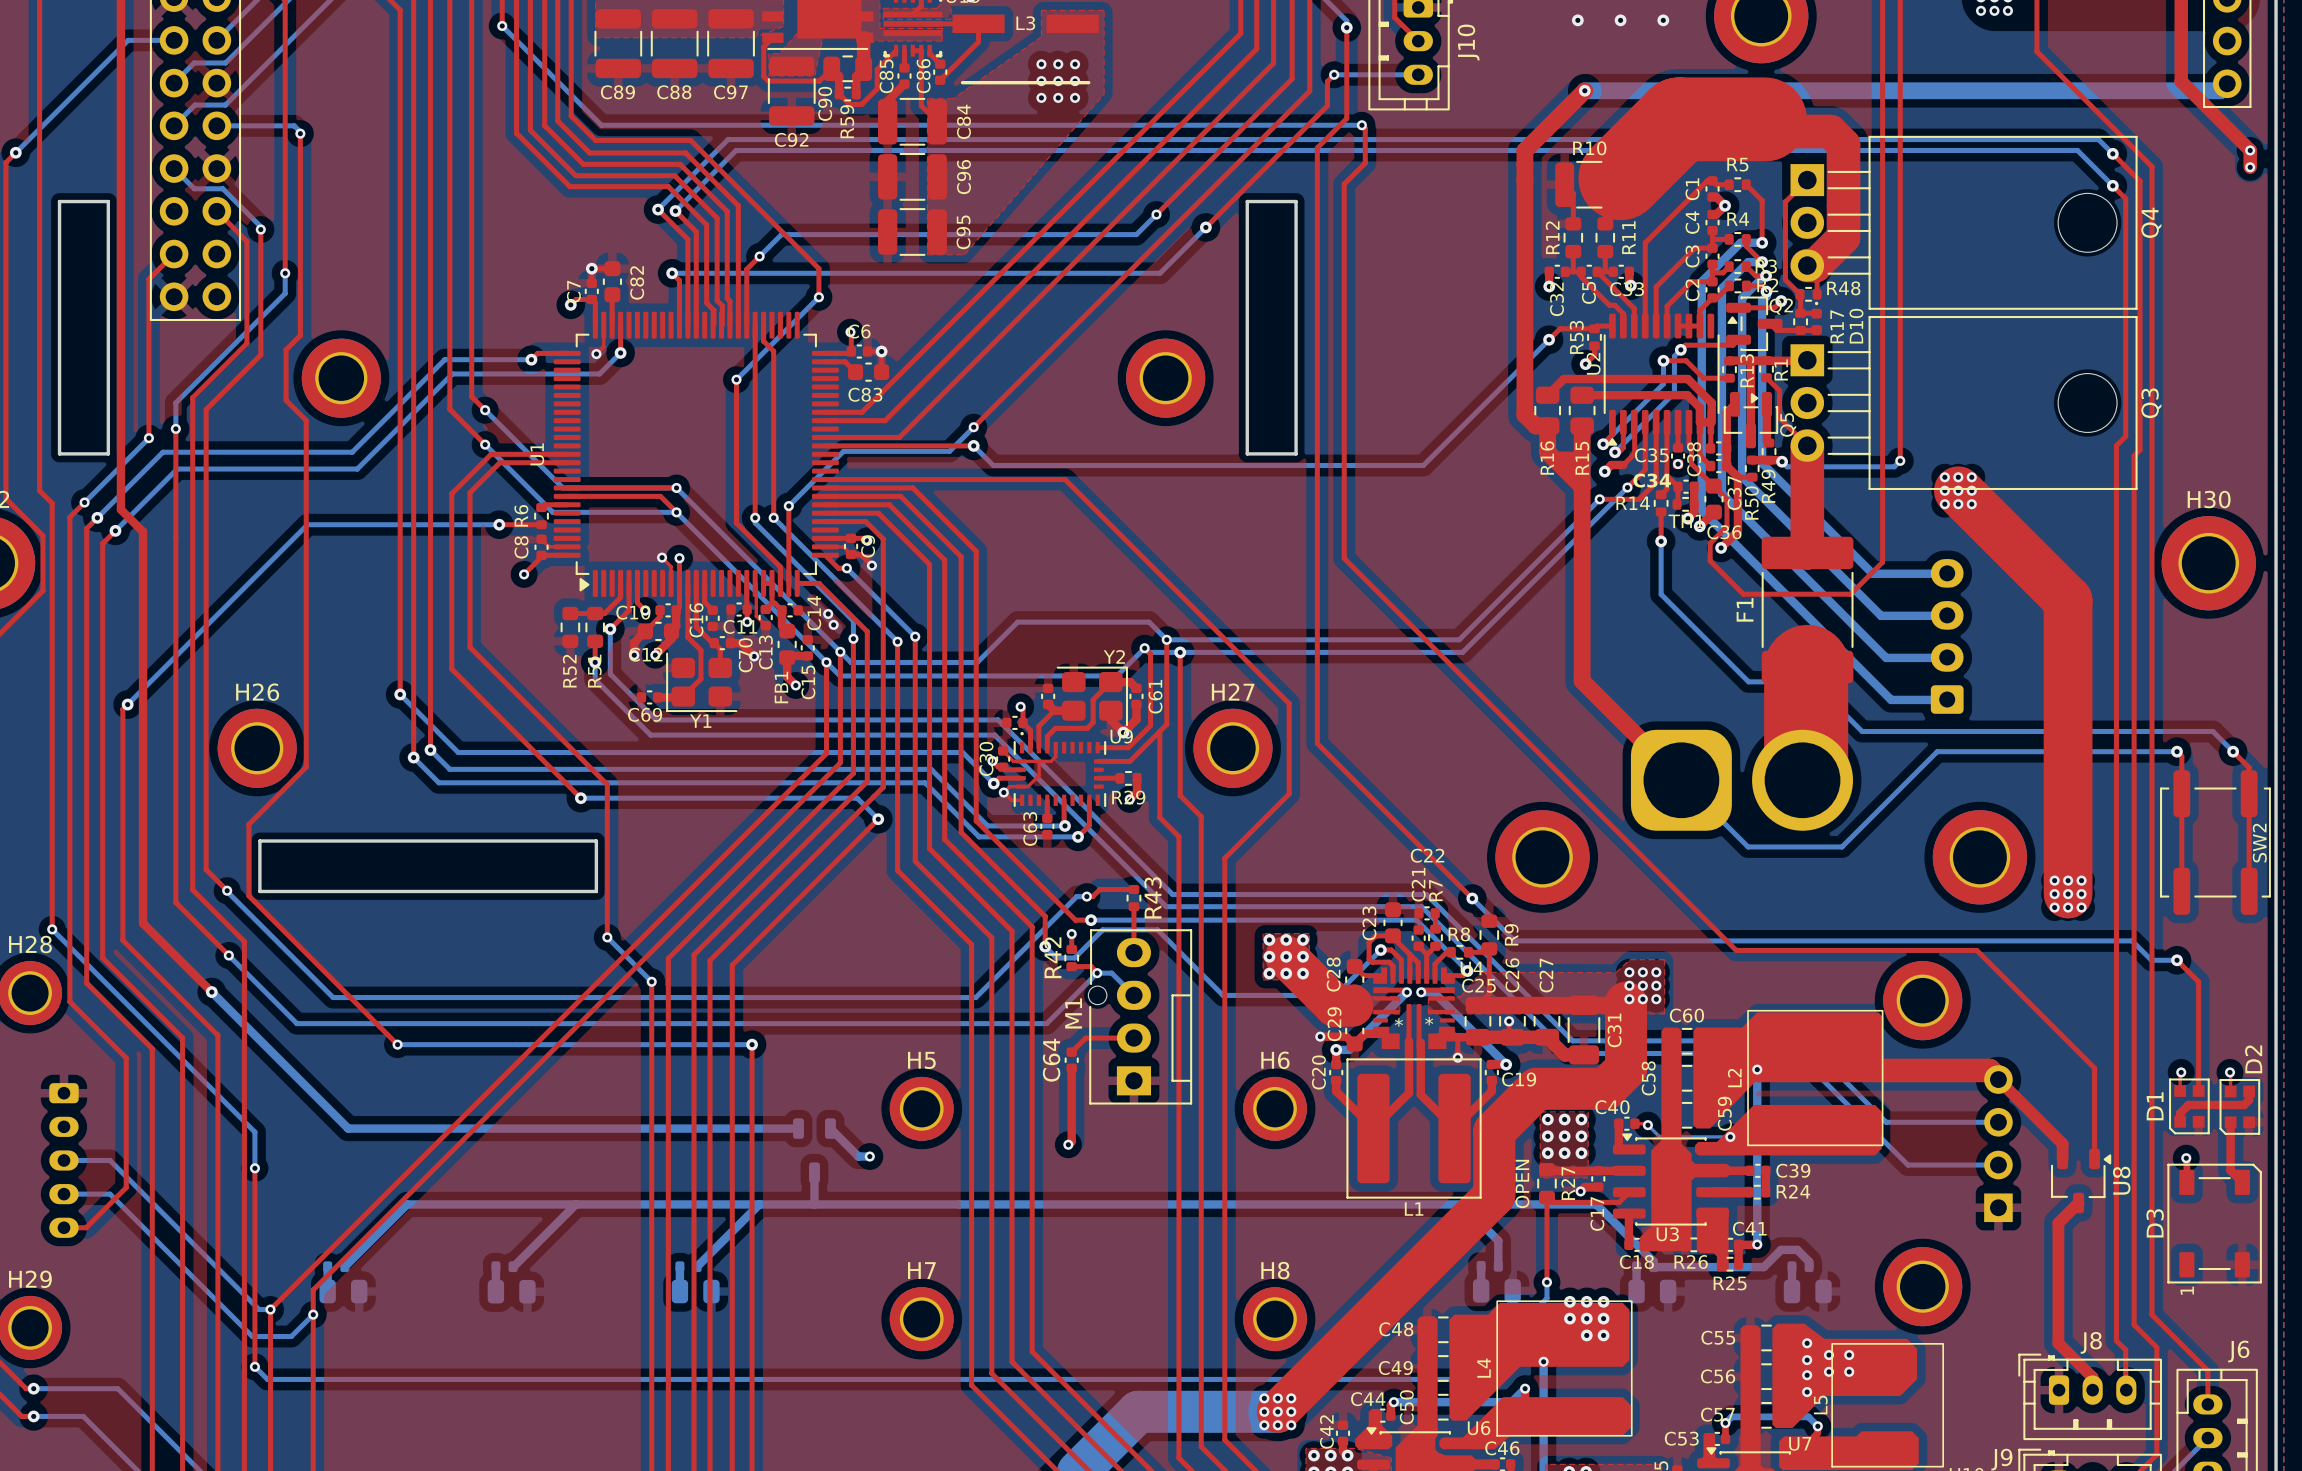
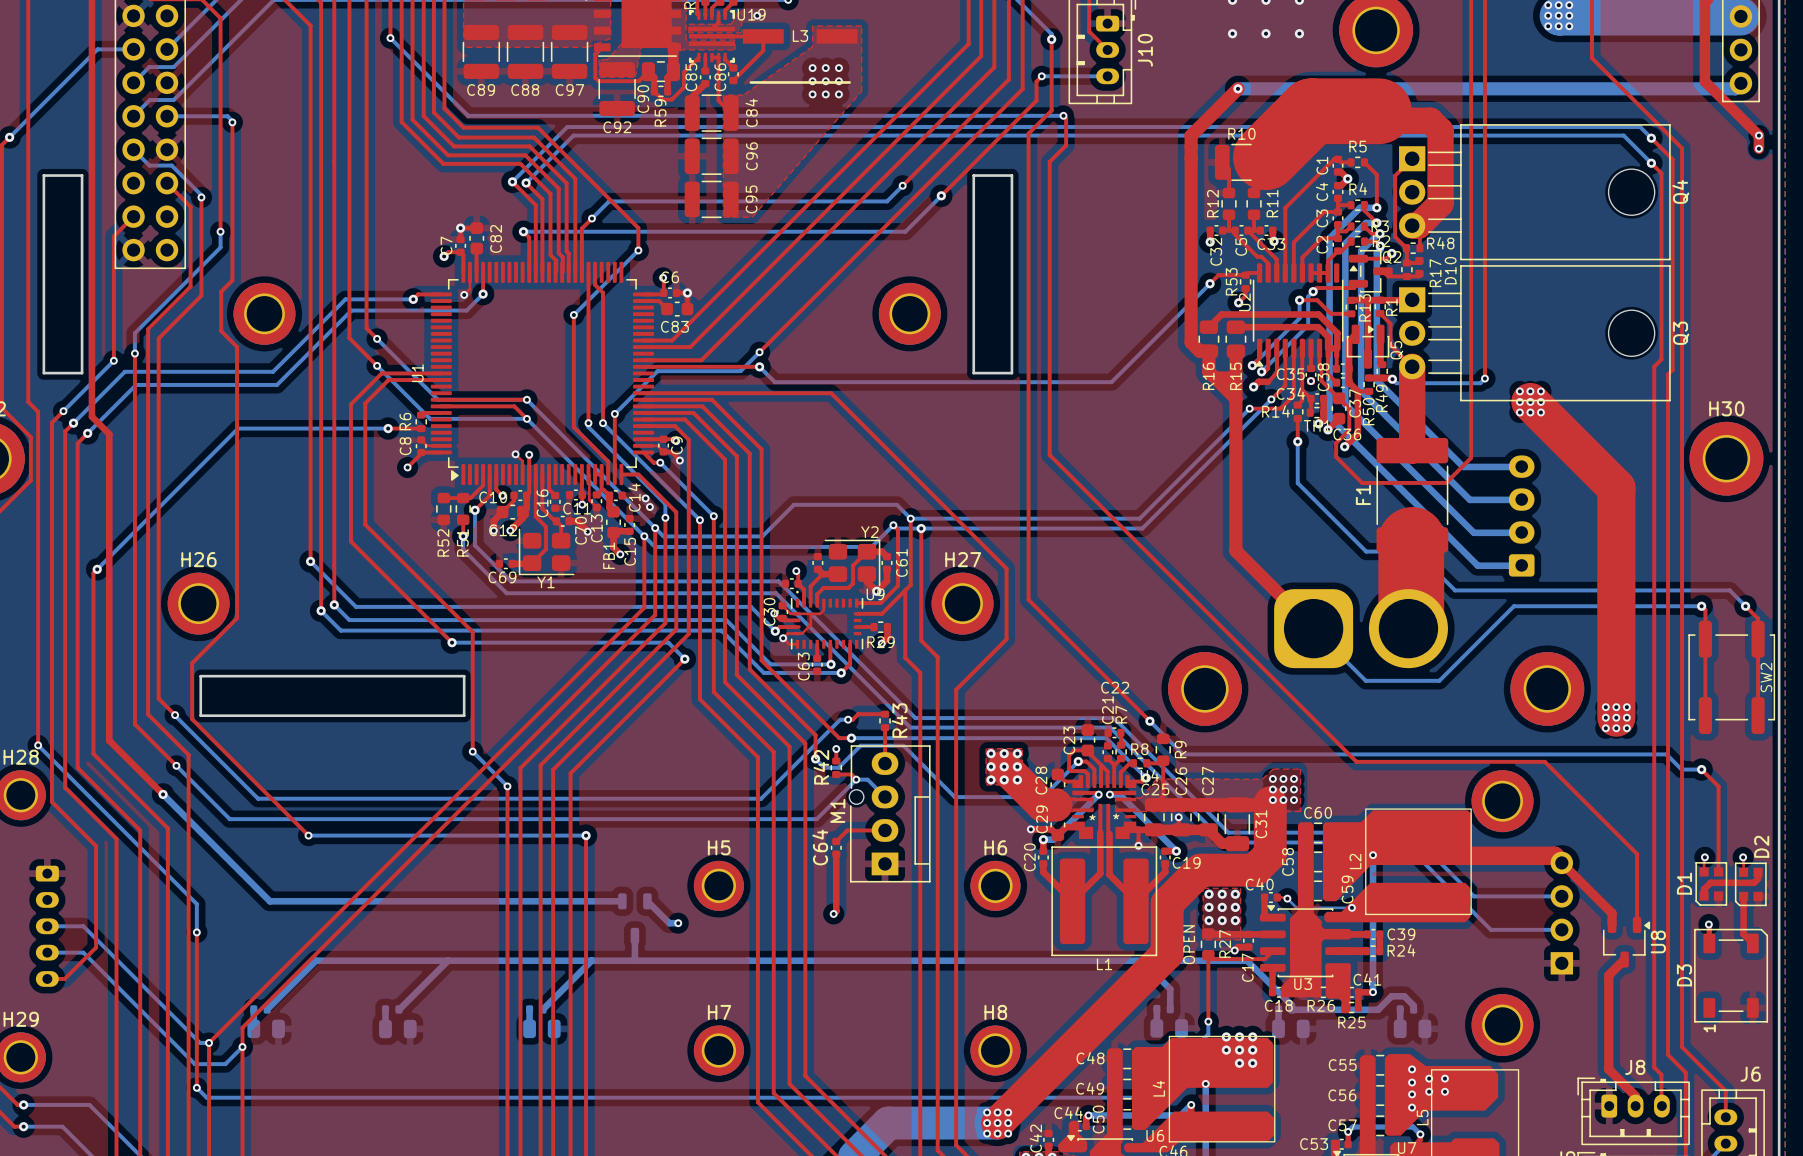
D10 footprint: [1811, 301, 1822, 335] -> [1415, 257, 1424, 278]

